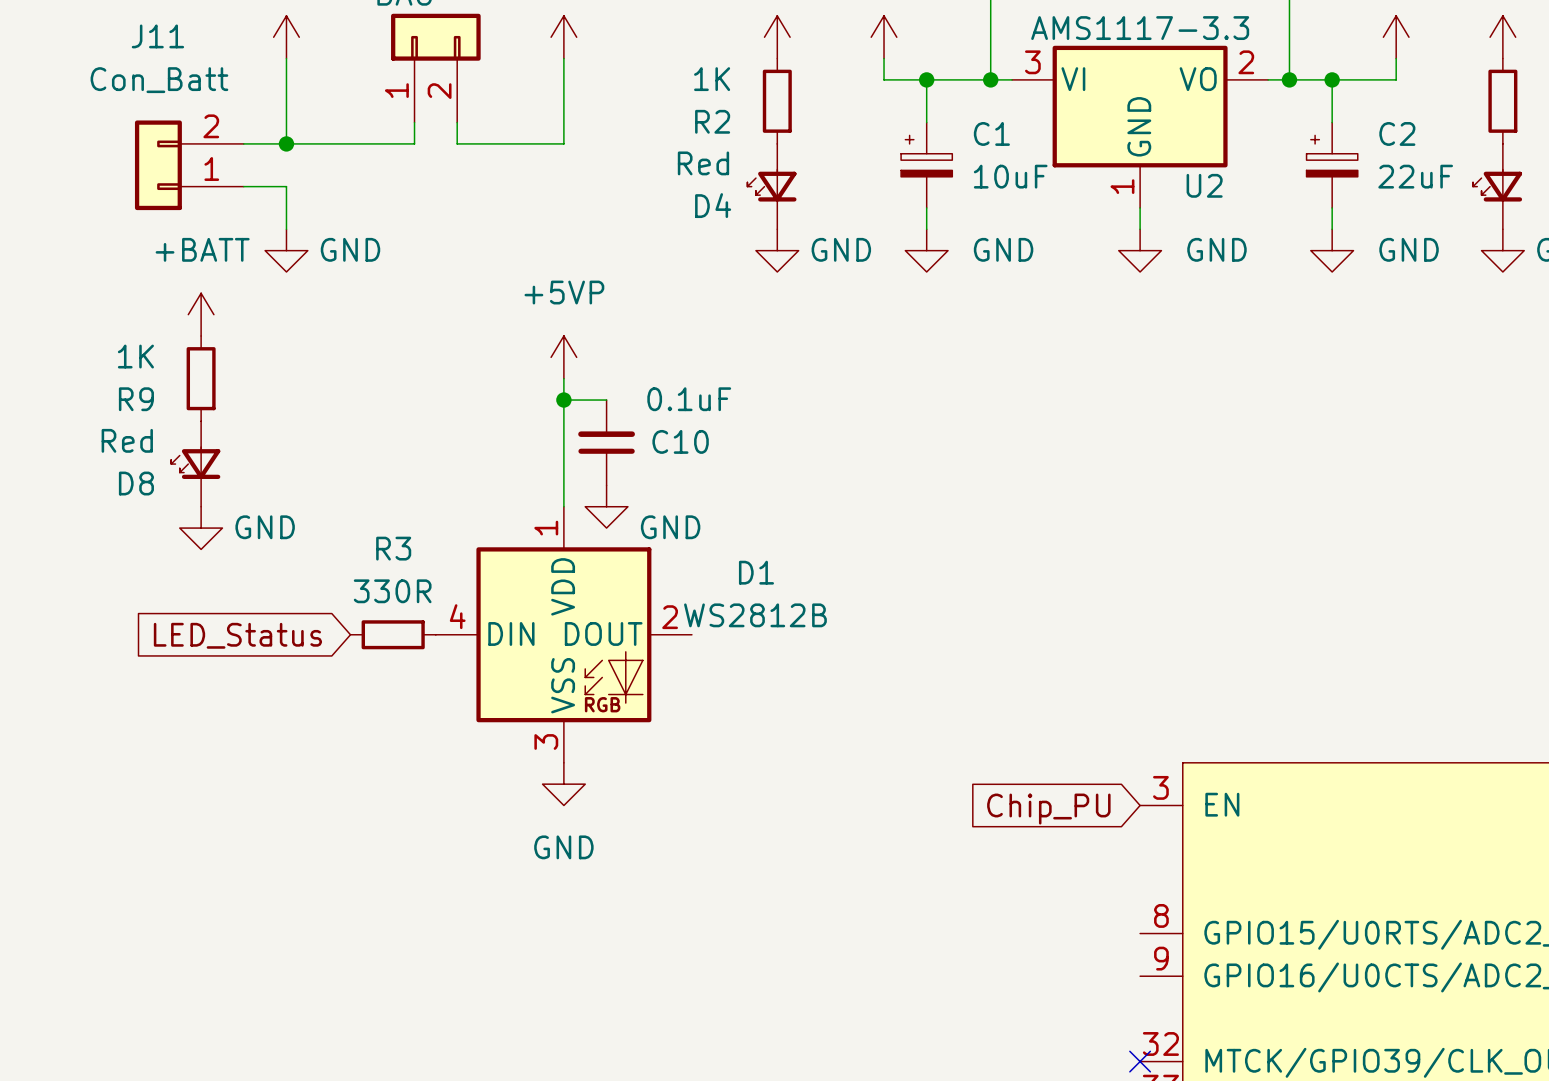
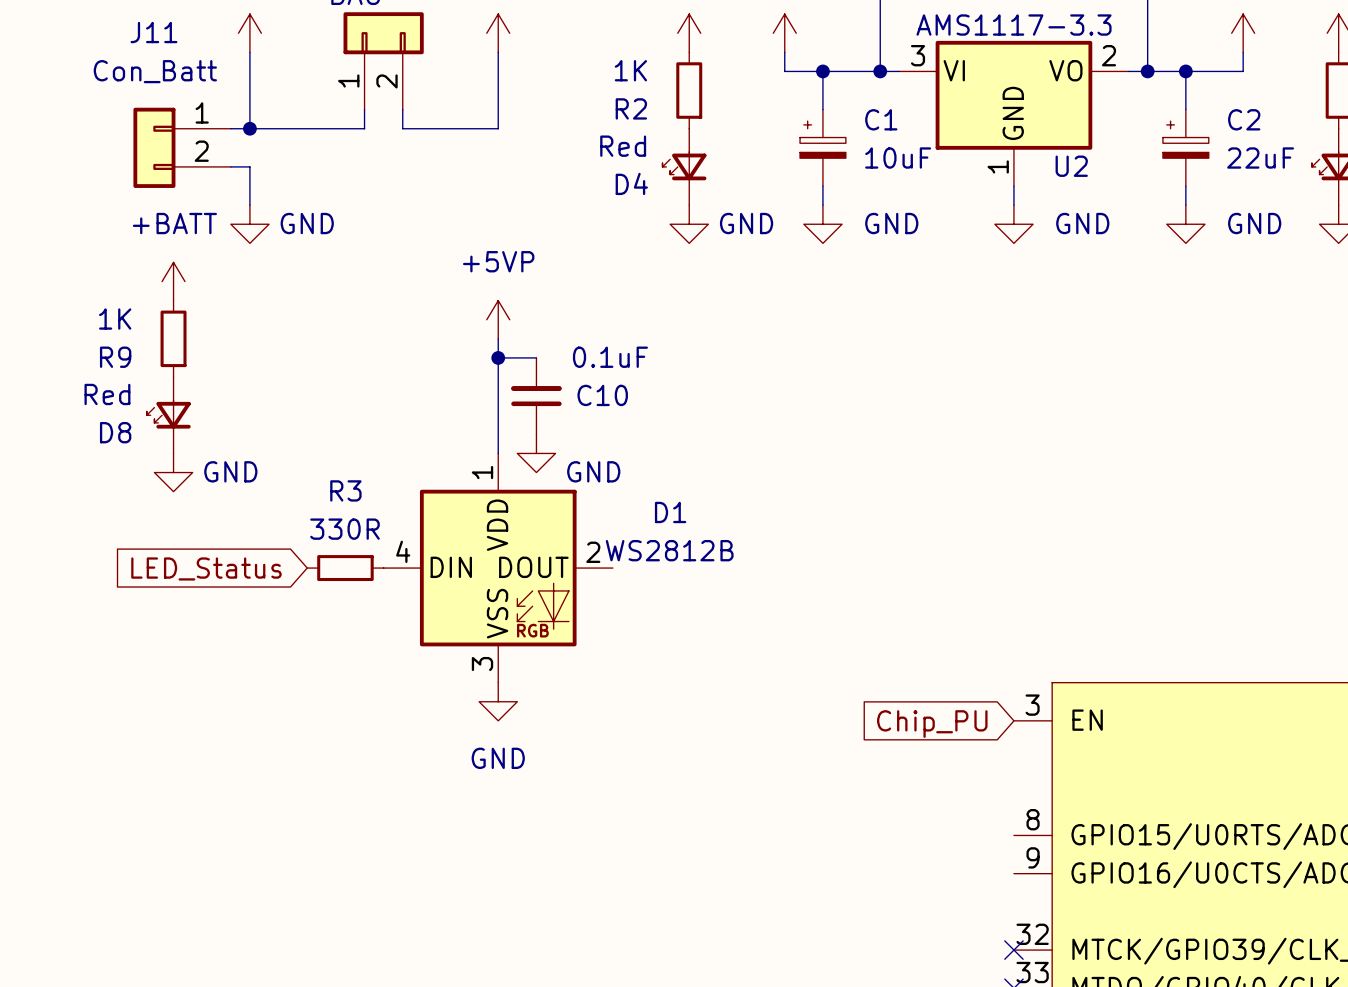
J11 flip: as is (158, 165) -> up-down (154, 147)

